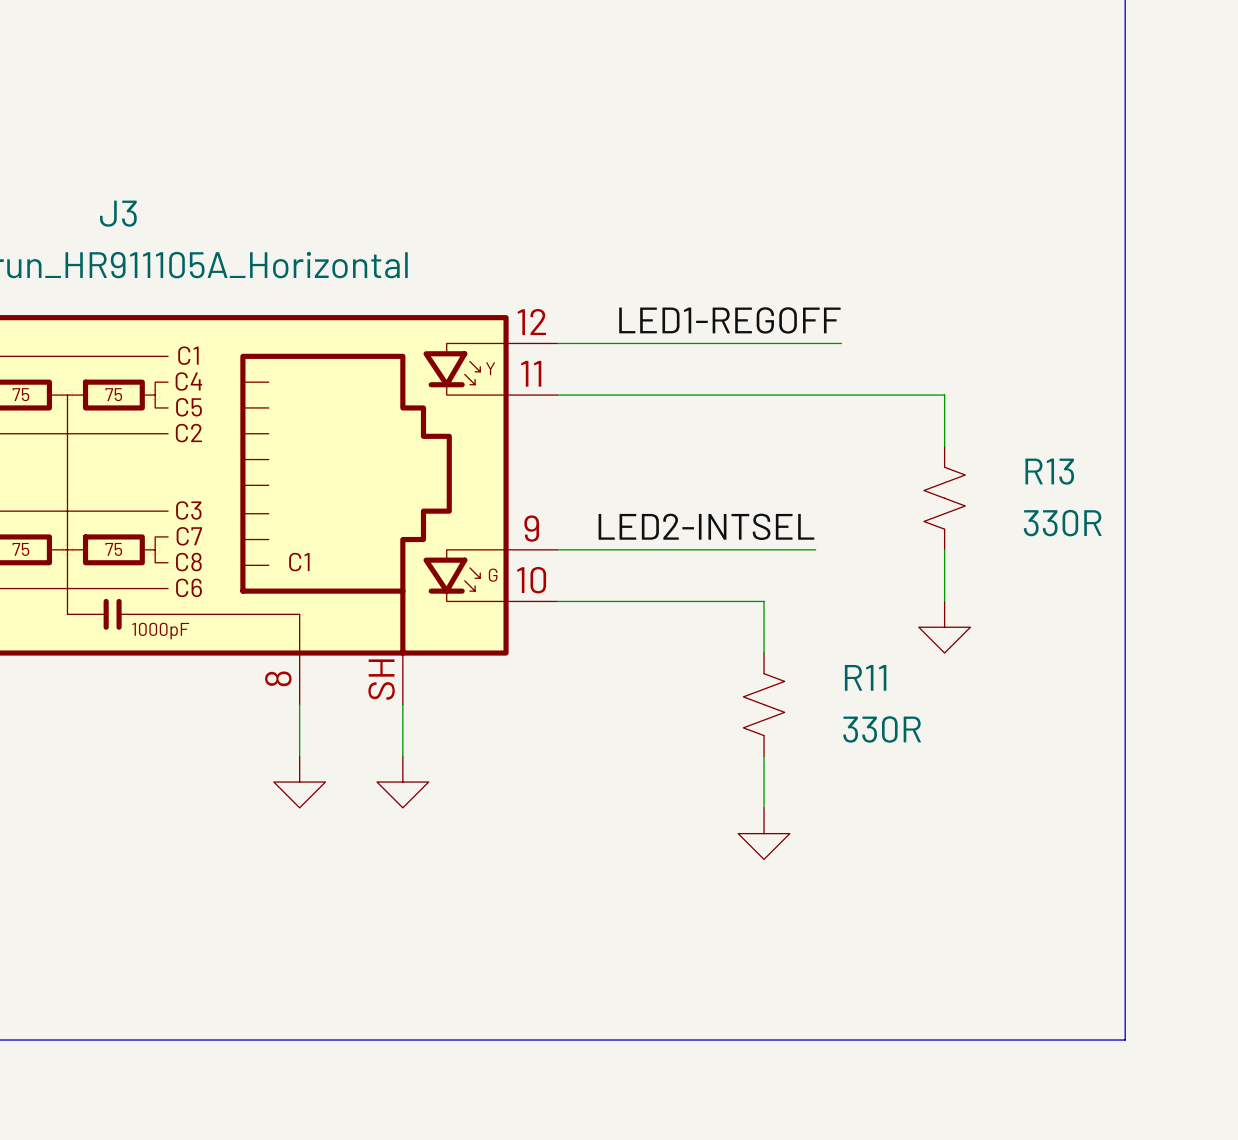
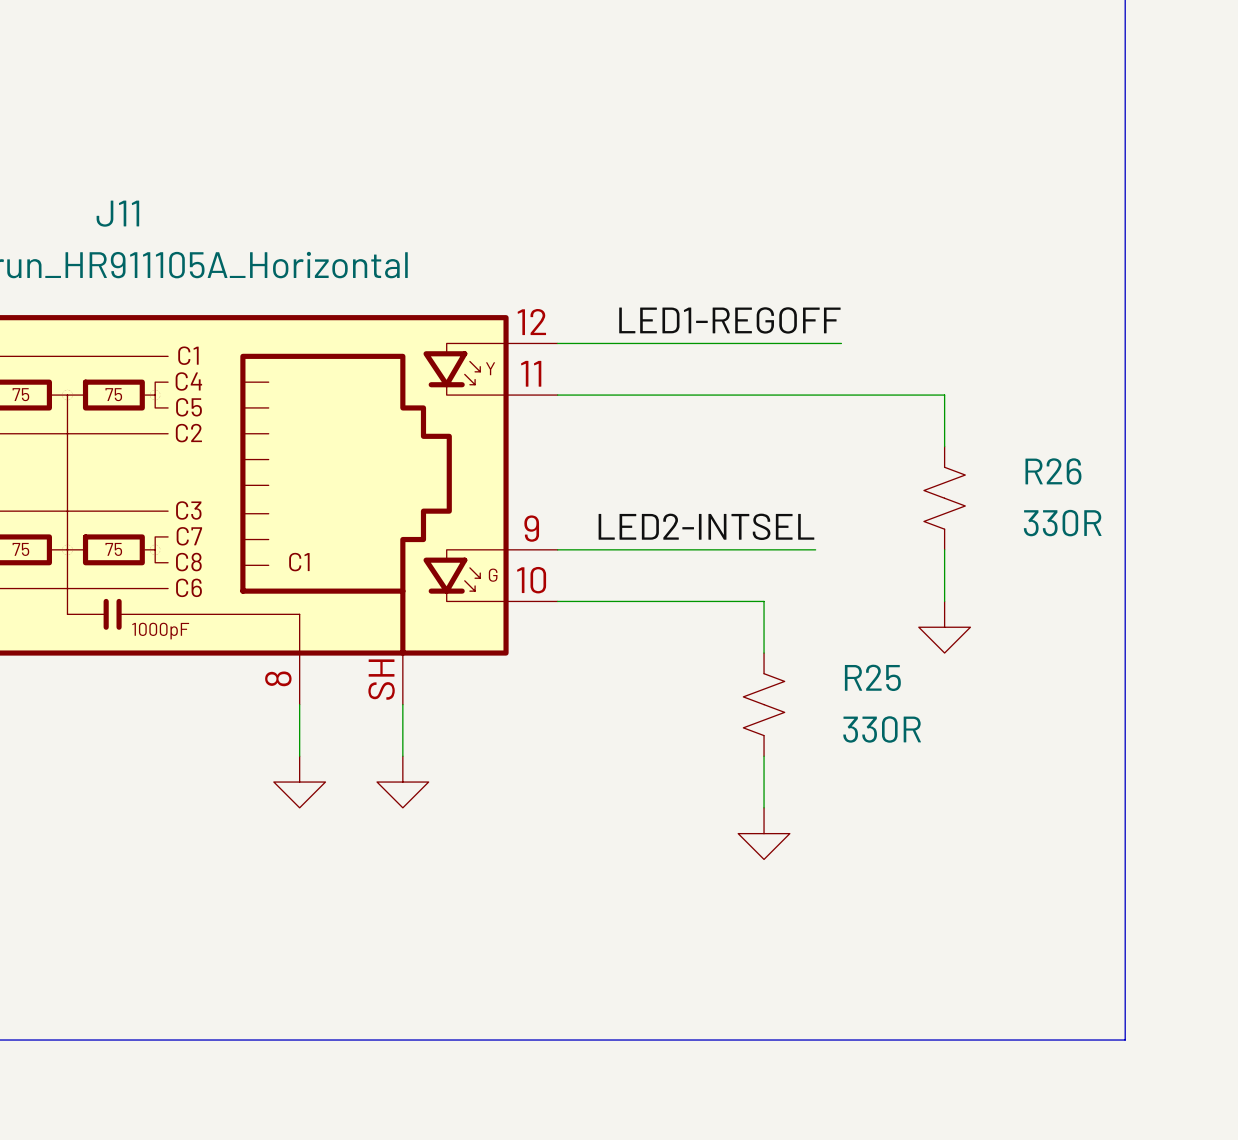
J3 name: J3 (118, 213) -> J11 (117, 213)
R13 name: R13 (1049, 471) -> R26 (1053, 471)
R11 name: R11 (865, 677) -> R25 (872, 677)

